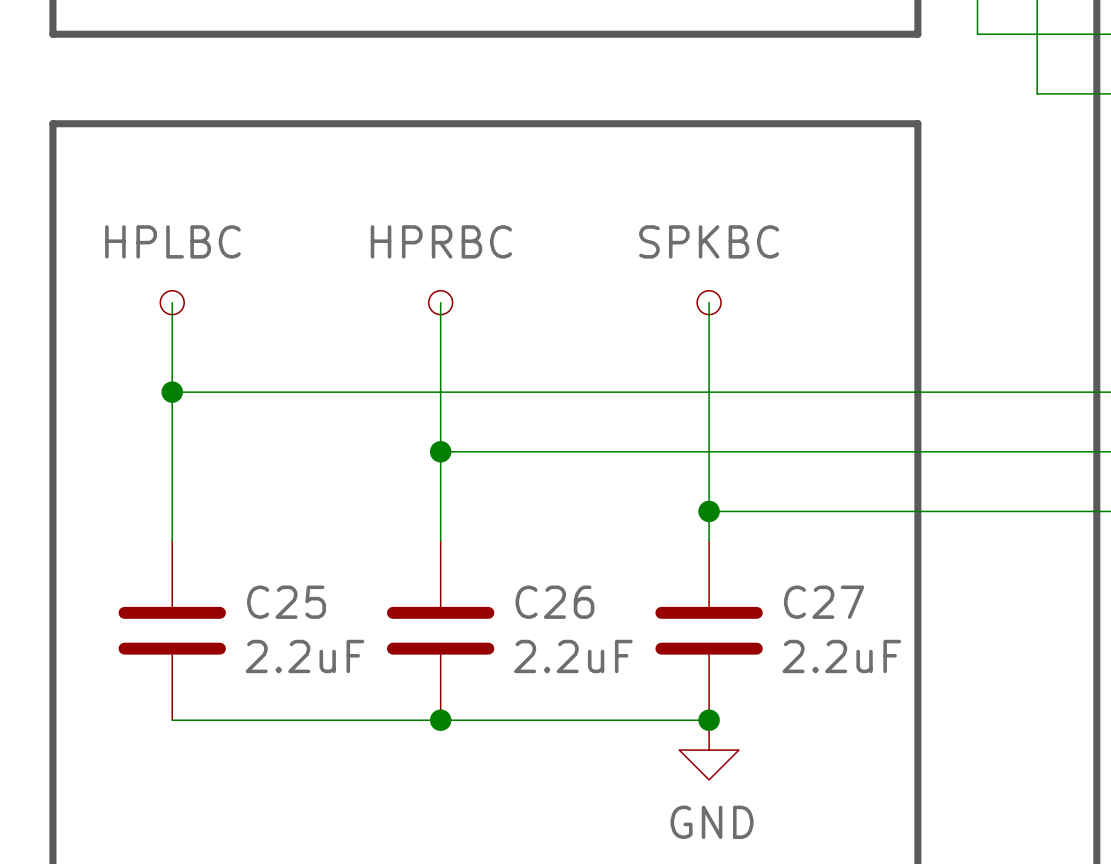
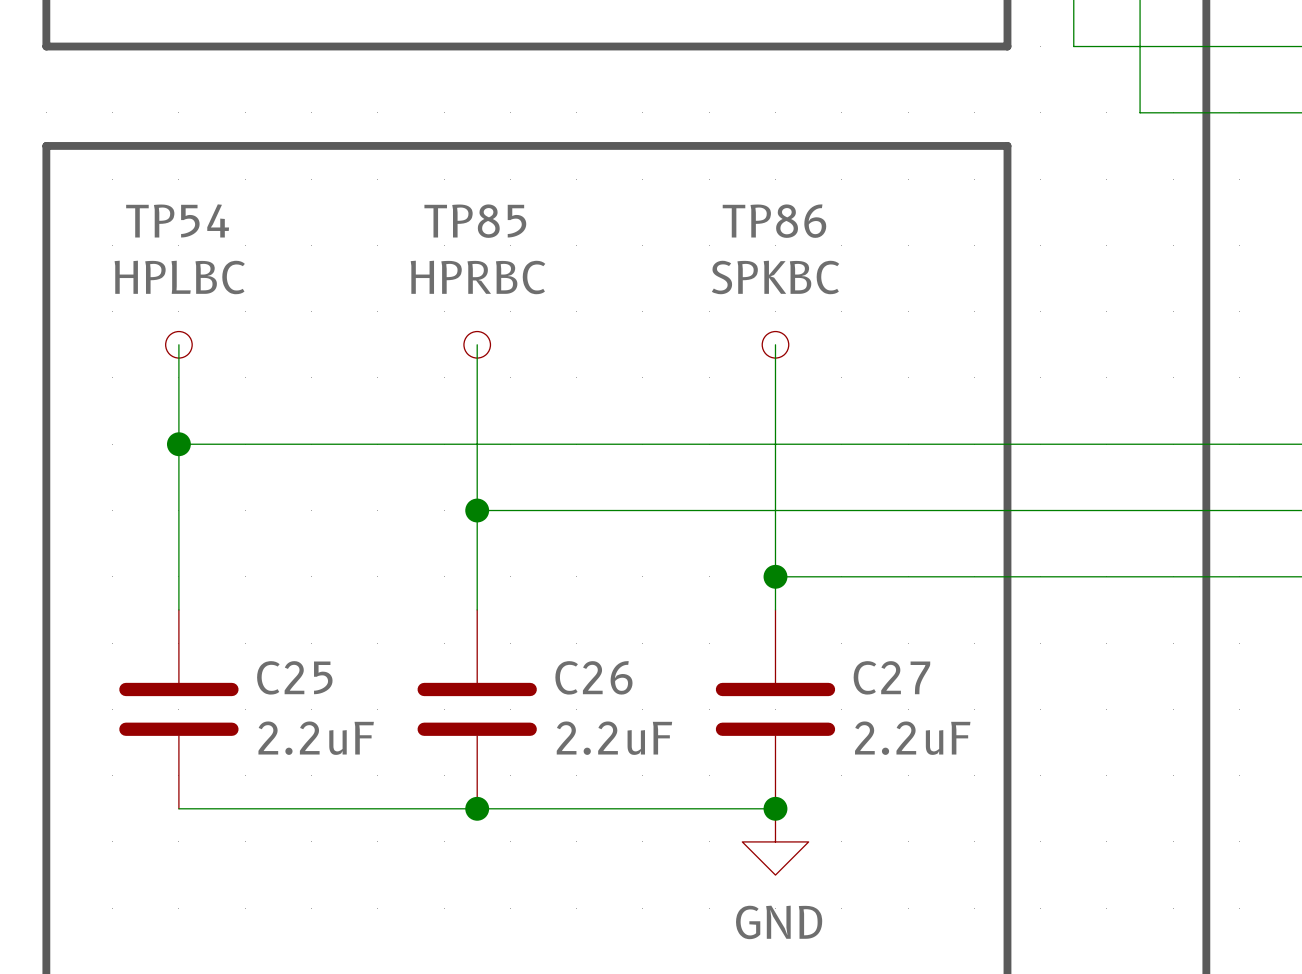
TP54 name: none -> TP54 (177, 220)
TP85 name: none -> TP85 (475, 221)
TP86 name: none -> TP86 (774, 221)

